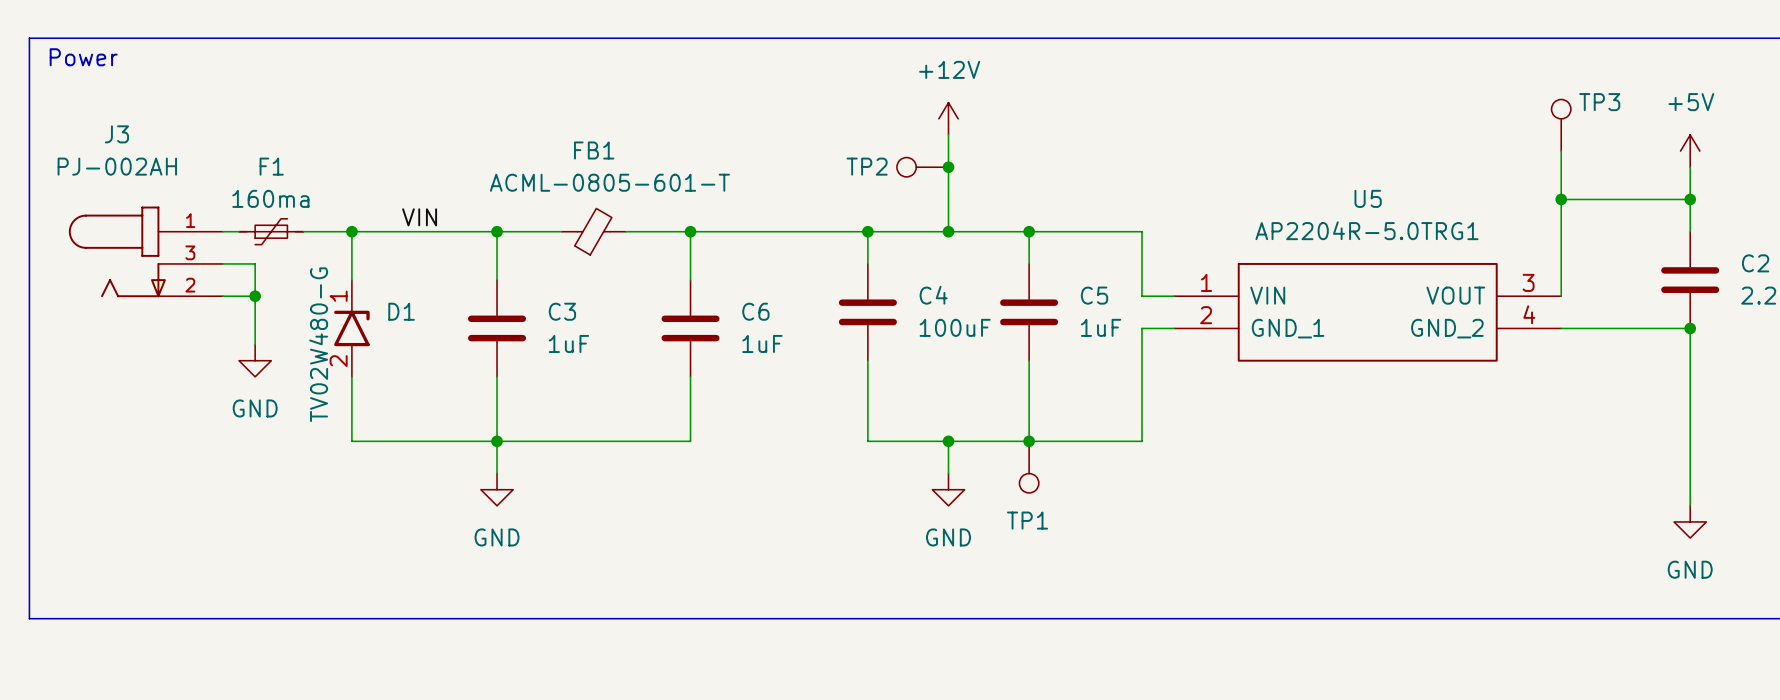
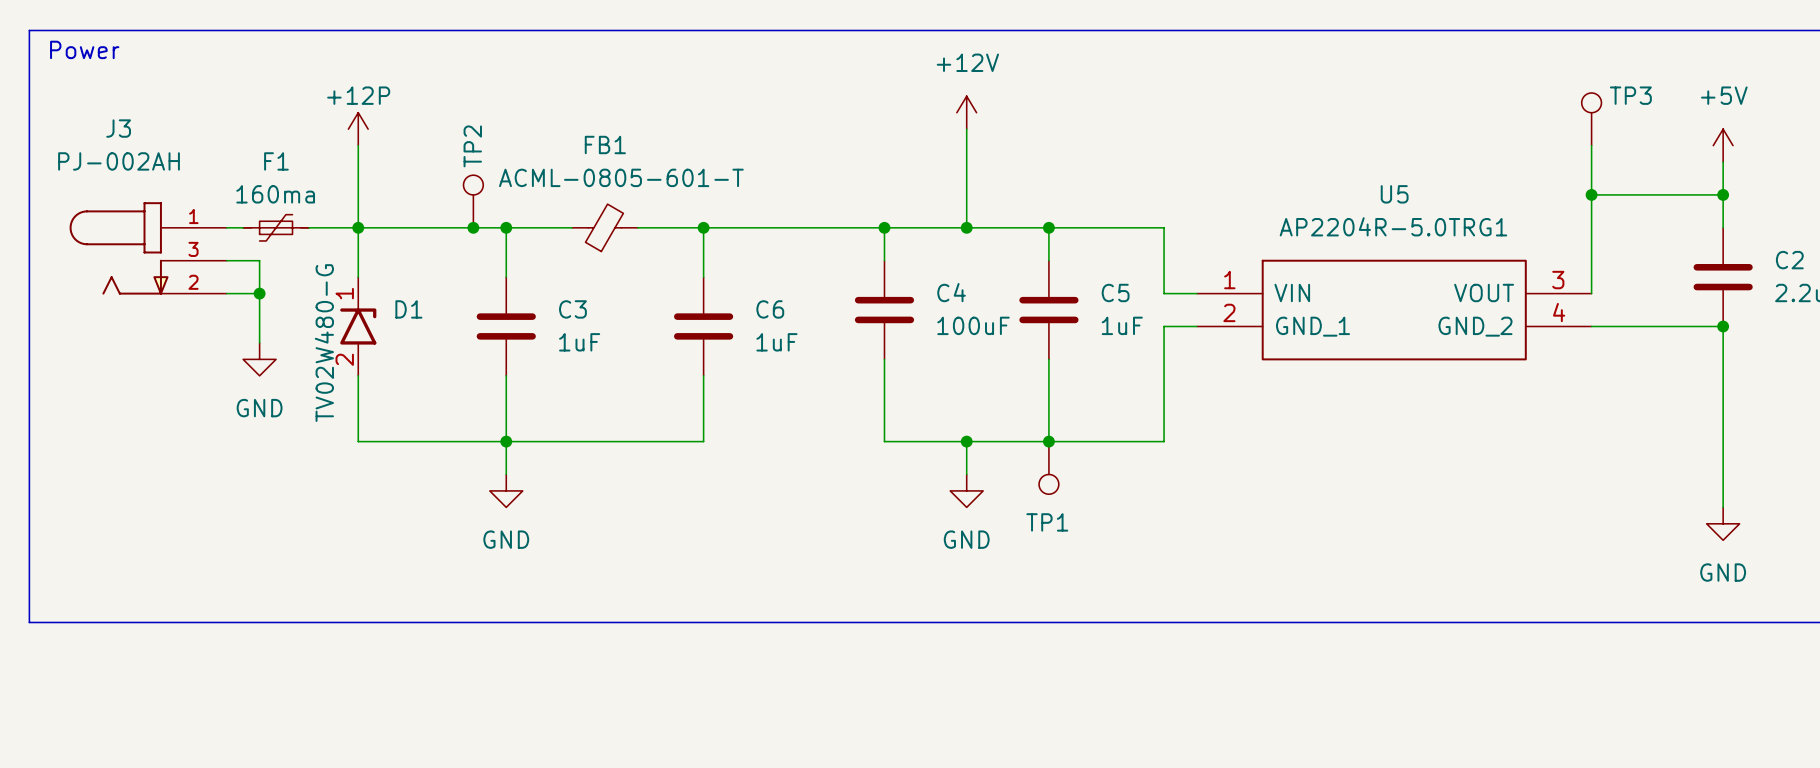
power symbol: none -> +12P (358, 129)
wire: none -> (358, 145) (358, 227)
TP2 rotation: 0° (906, 167) -> 90° clockwise (473, 185)
TP2 position: (922, 167) -> (473, 201)
junction: (948, 167) -> none
label: VIN (419, 217) -> none
junction: none -> (473, 227)

